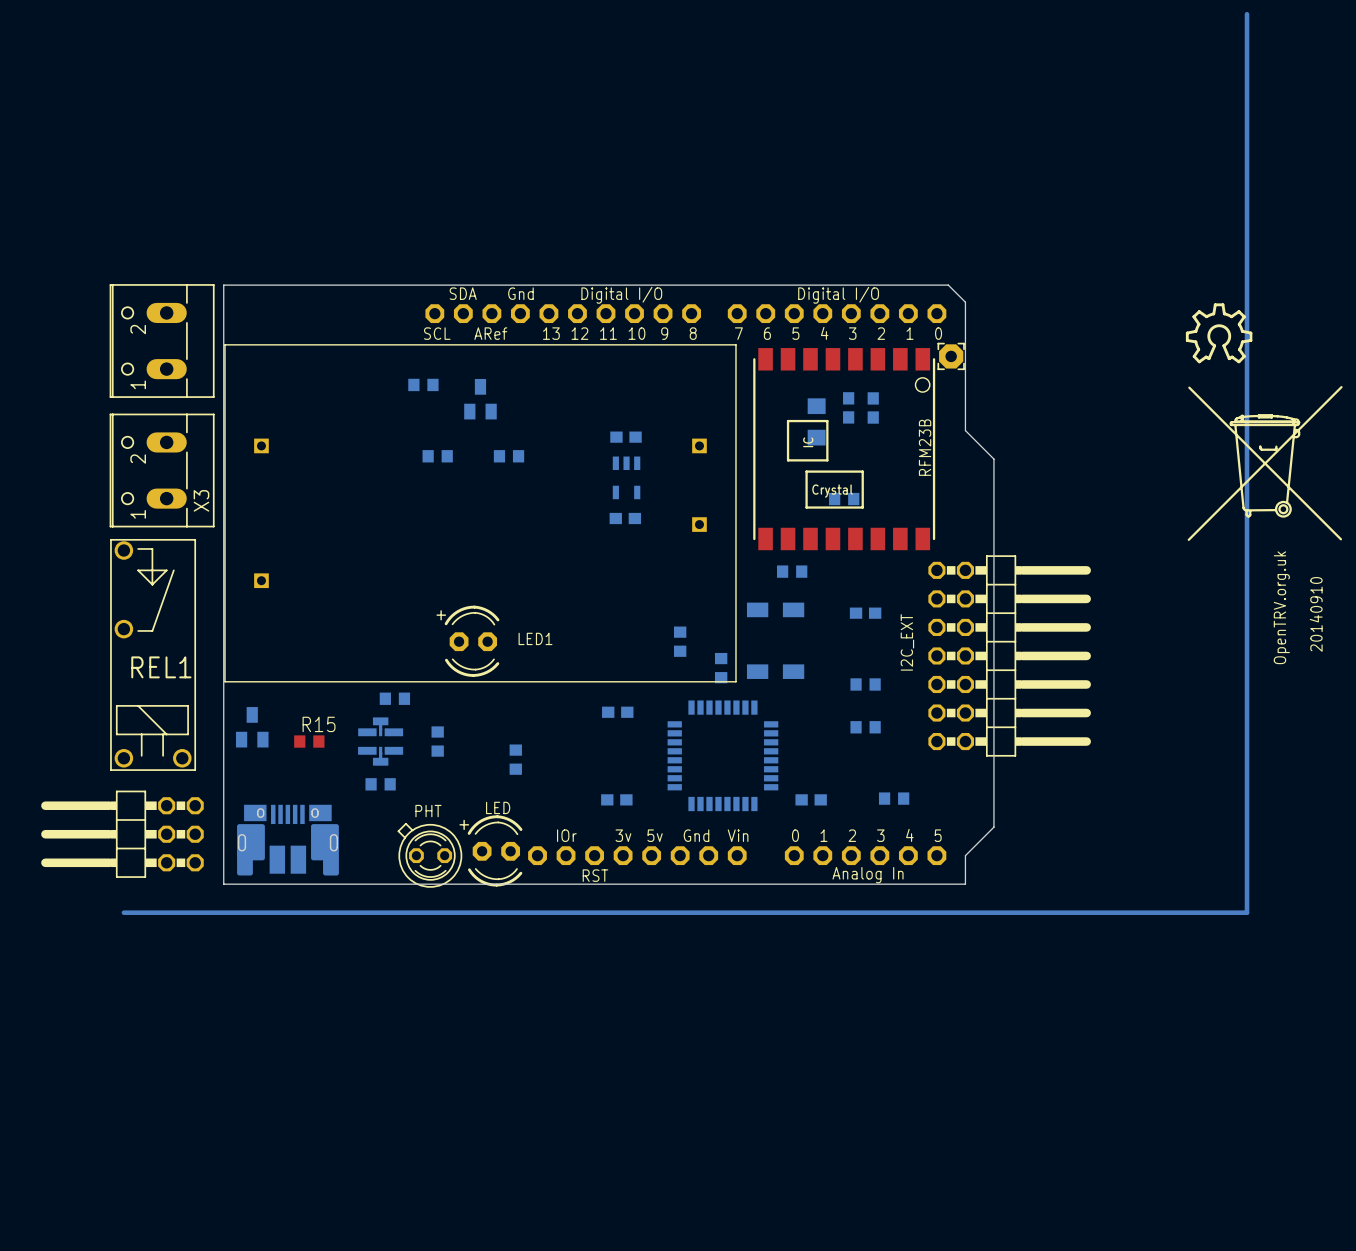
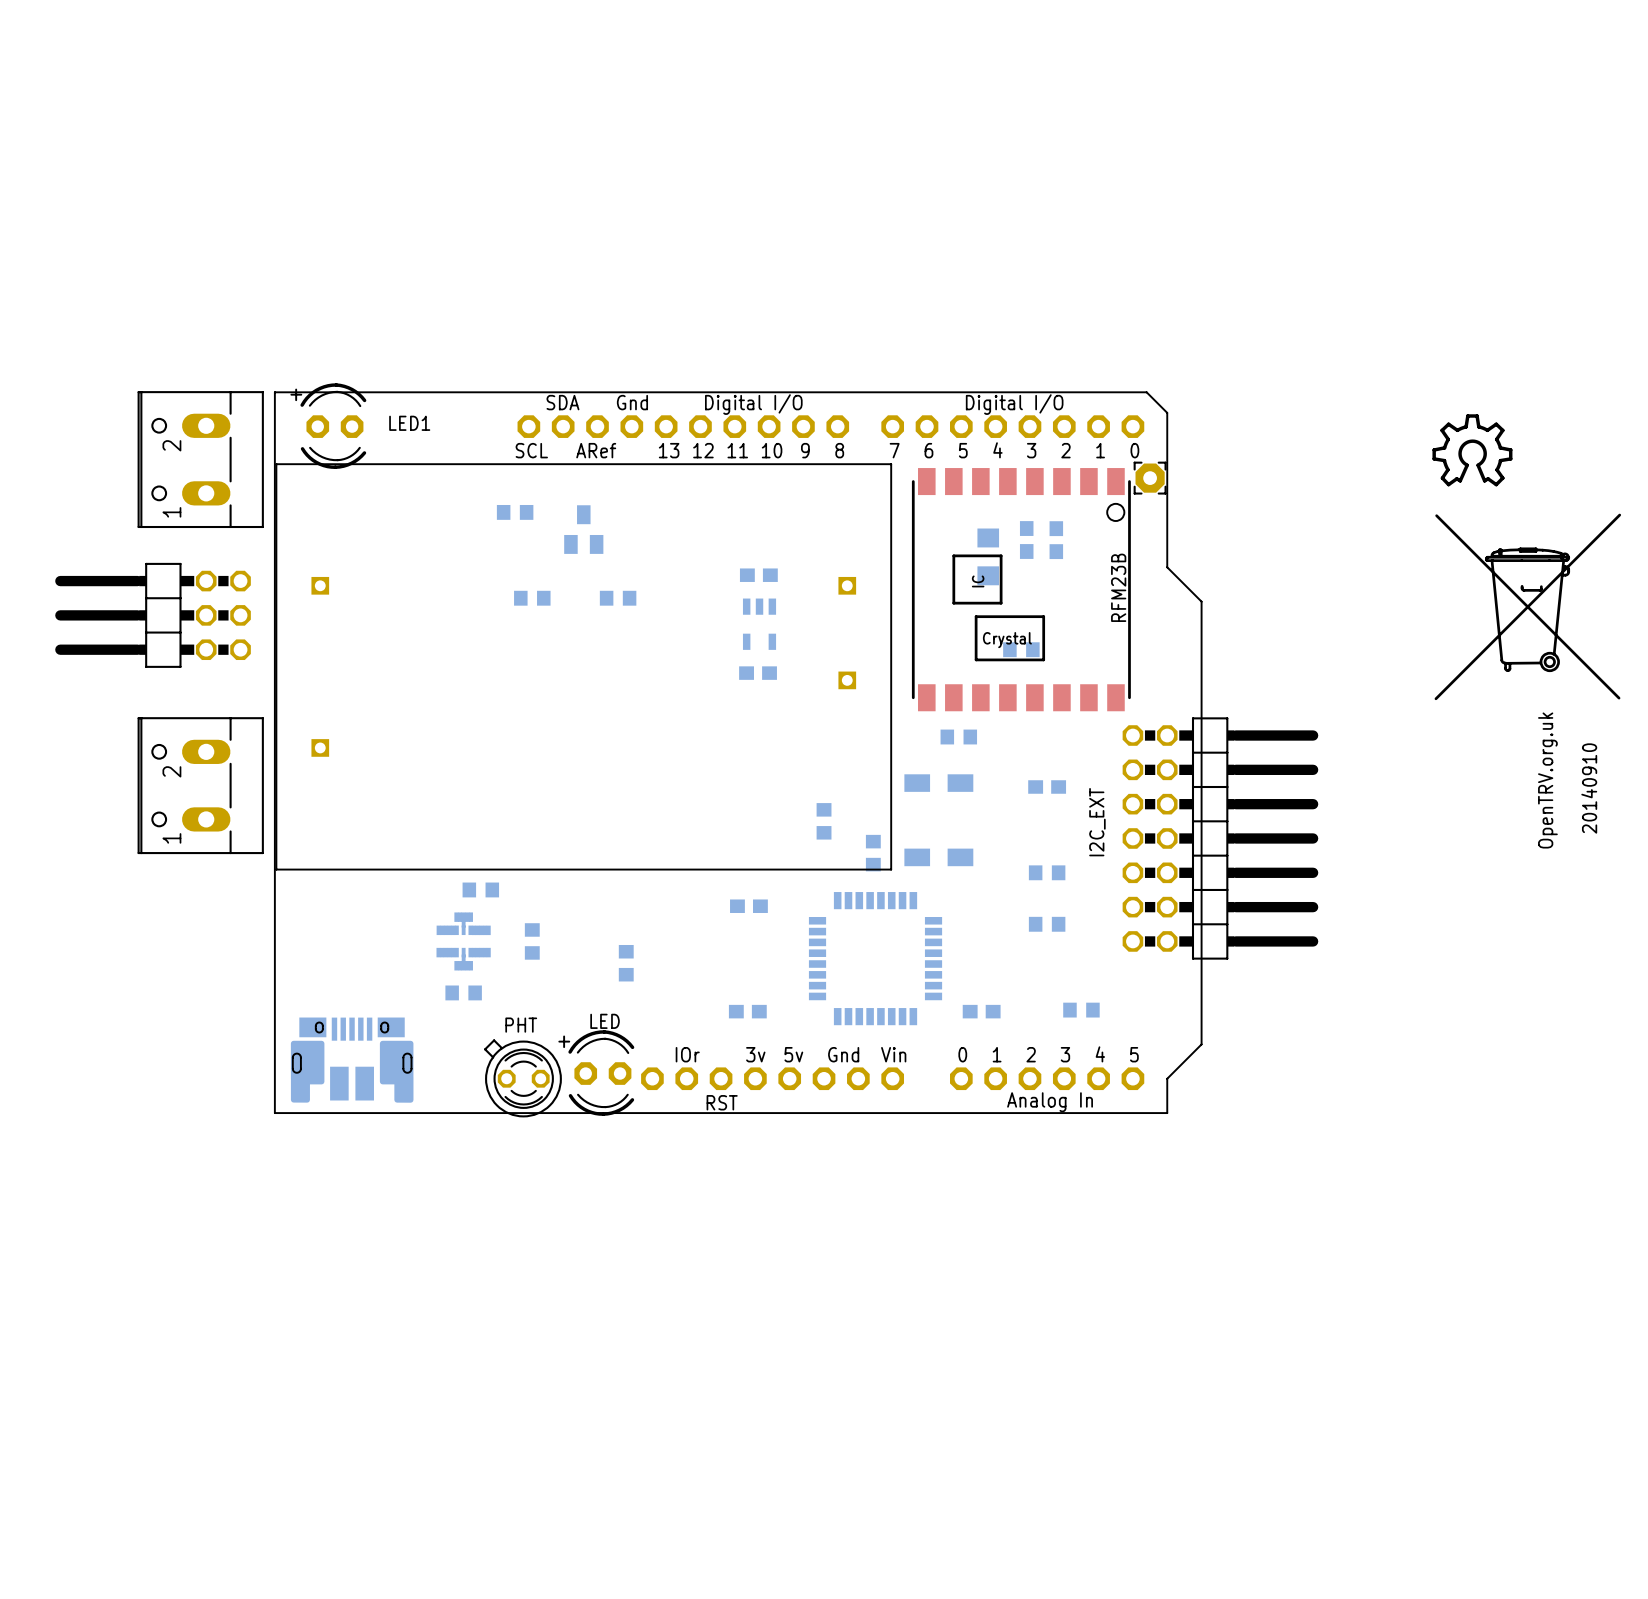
bottom track: (1247, 14) (1247, 912) (123, 912) -> none
part: none -> (153, 615)
X3: (162, 470) -> none
part: none -> (200, 785)
LED1 position: (467, 641) -> (328, 426)
REL1: (153, 654) -> none
part: (252, 727) -> none
R15: (309, 741) -> none
part: (122, 834) -> none

